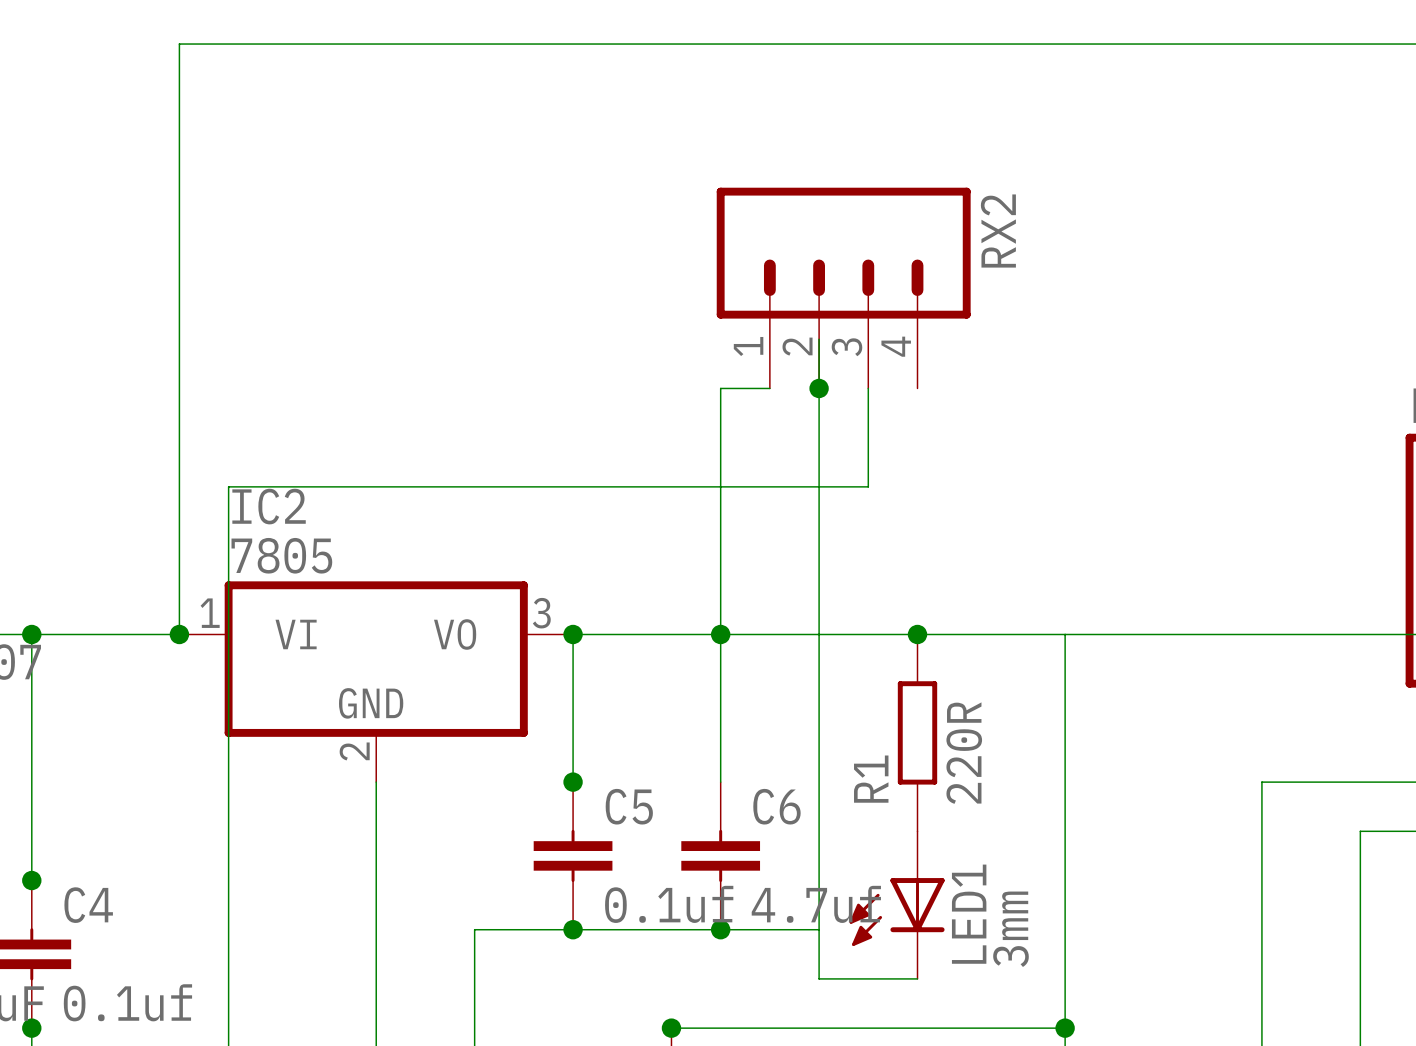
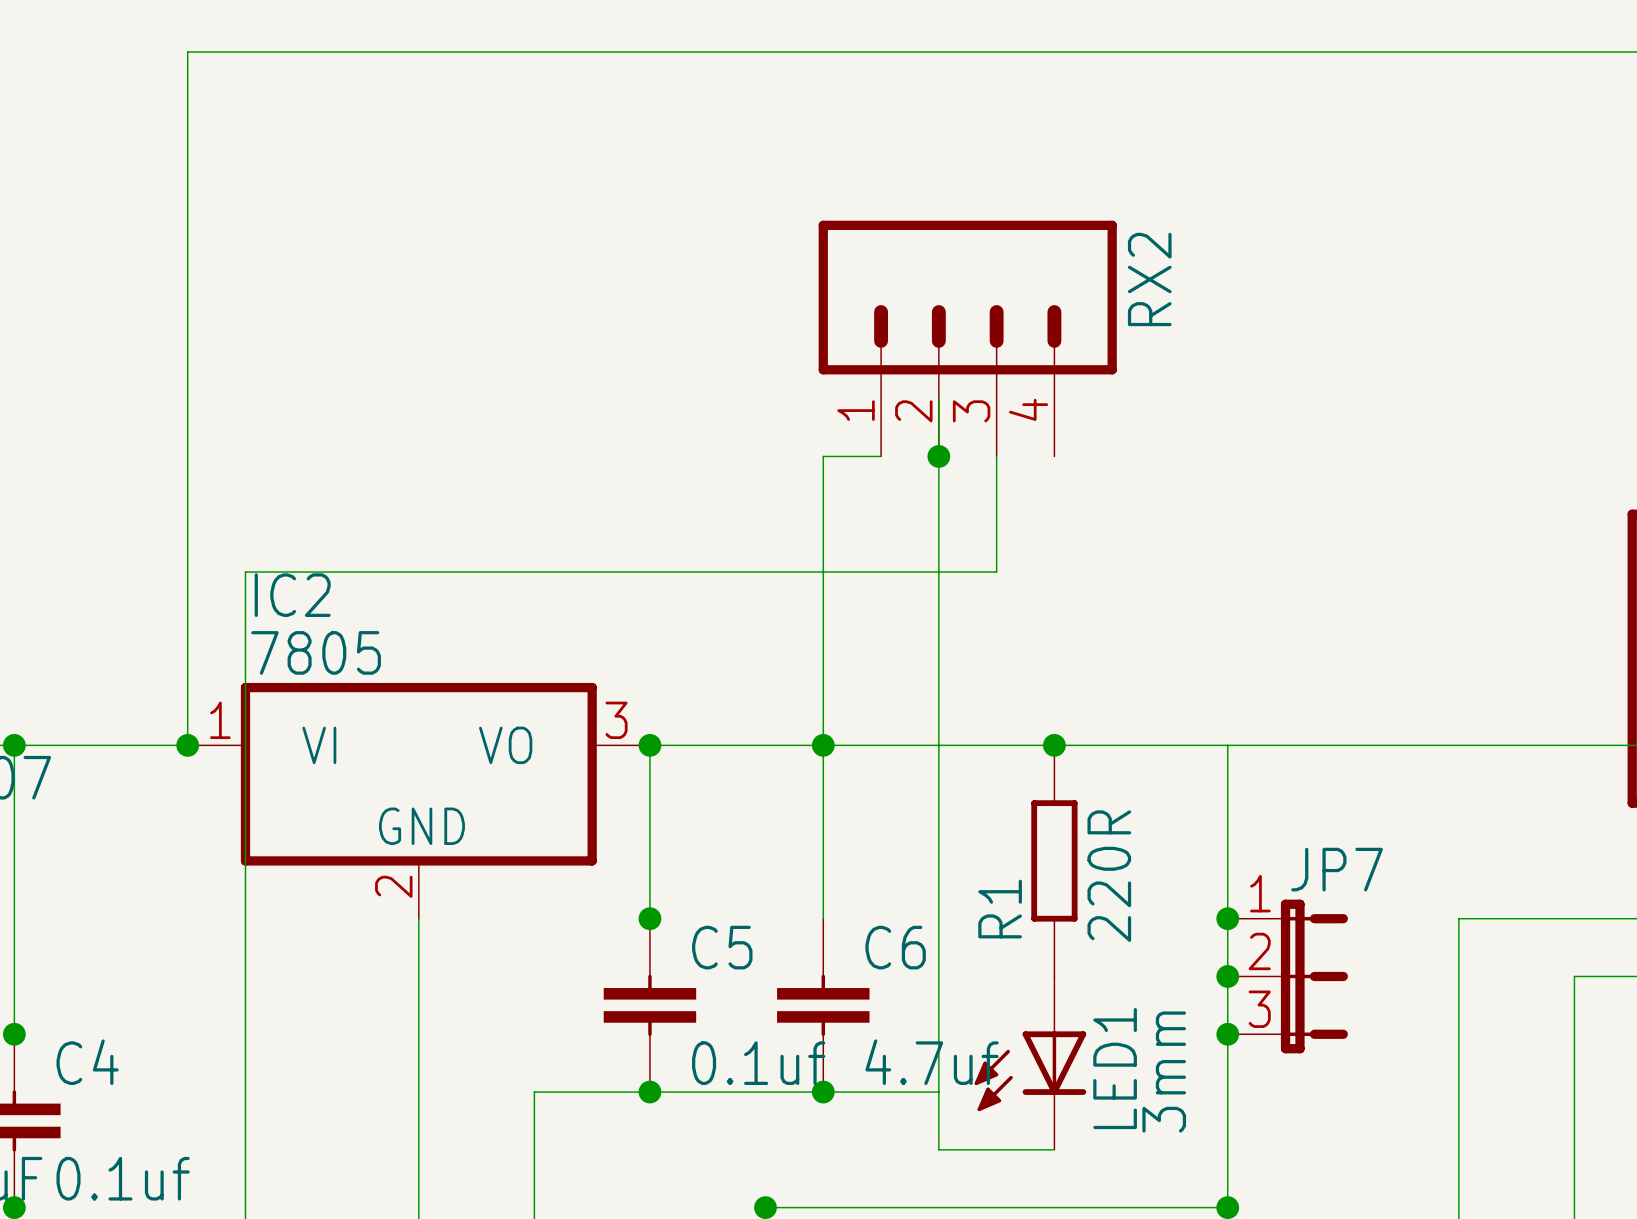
junction: none -> (1227, 918)
junction: none -> (1227, 976)
JP7: none -> (1287, 976)
junction: none -> (1227, 1034)

